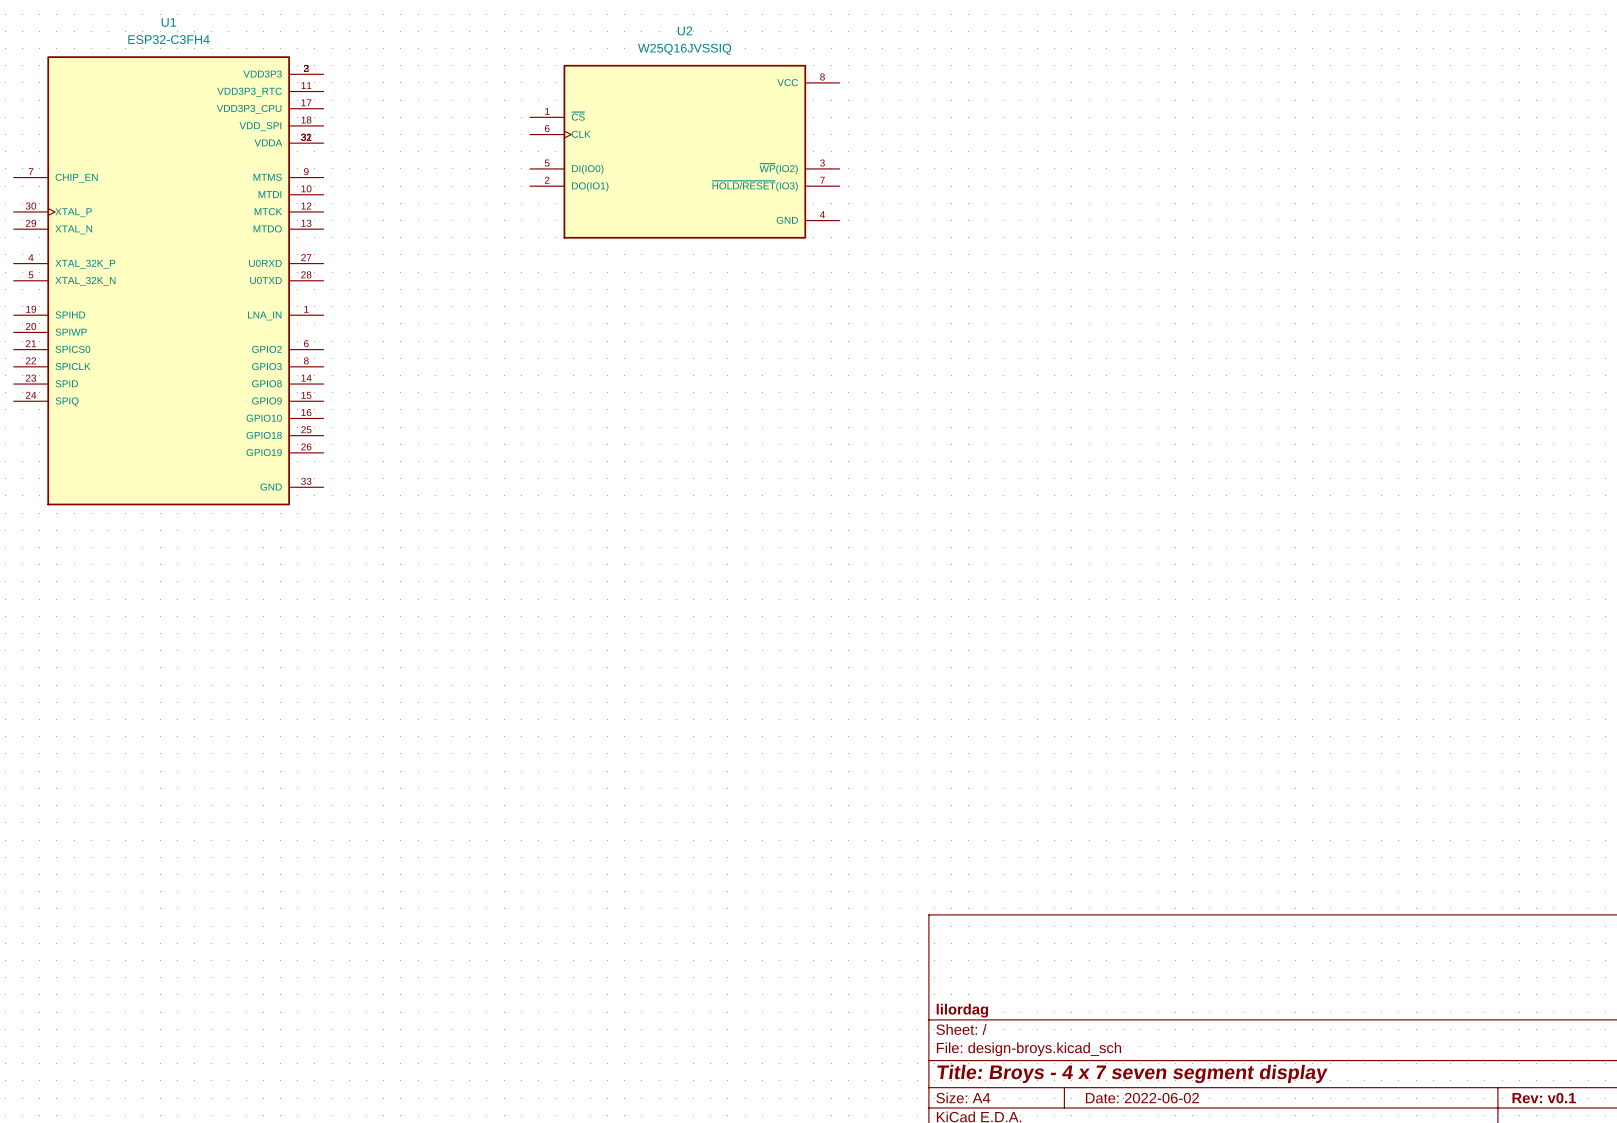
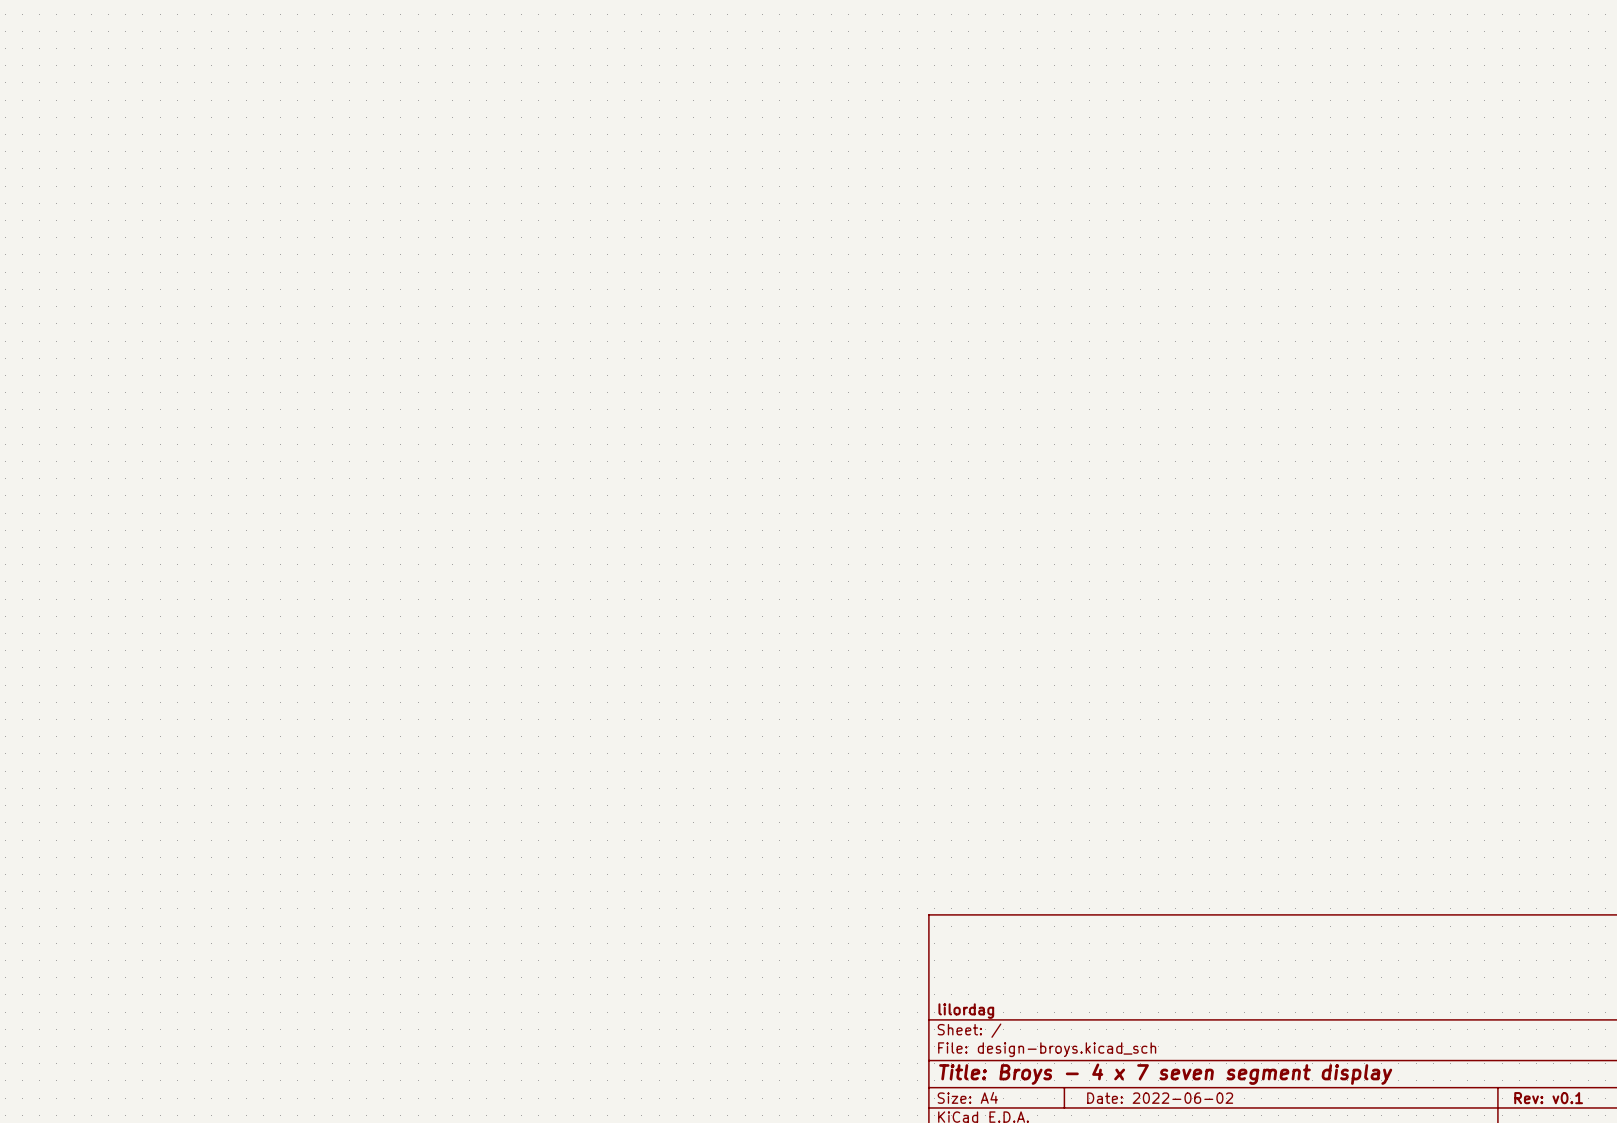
U2: W25Q16JVSSIQ (684, 151) -> none
U1: ESP32-C3FH4 (168, 280) -> none

